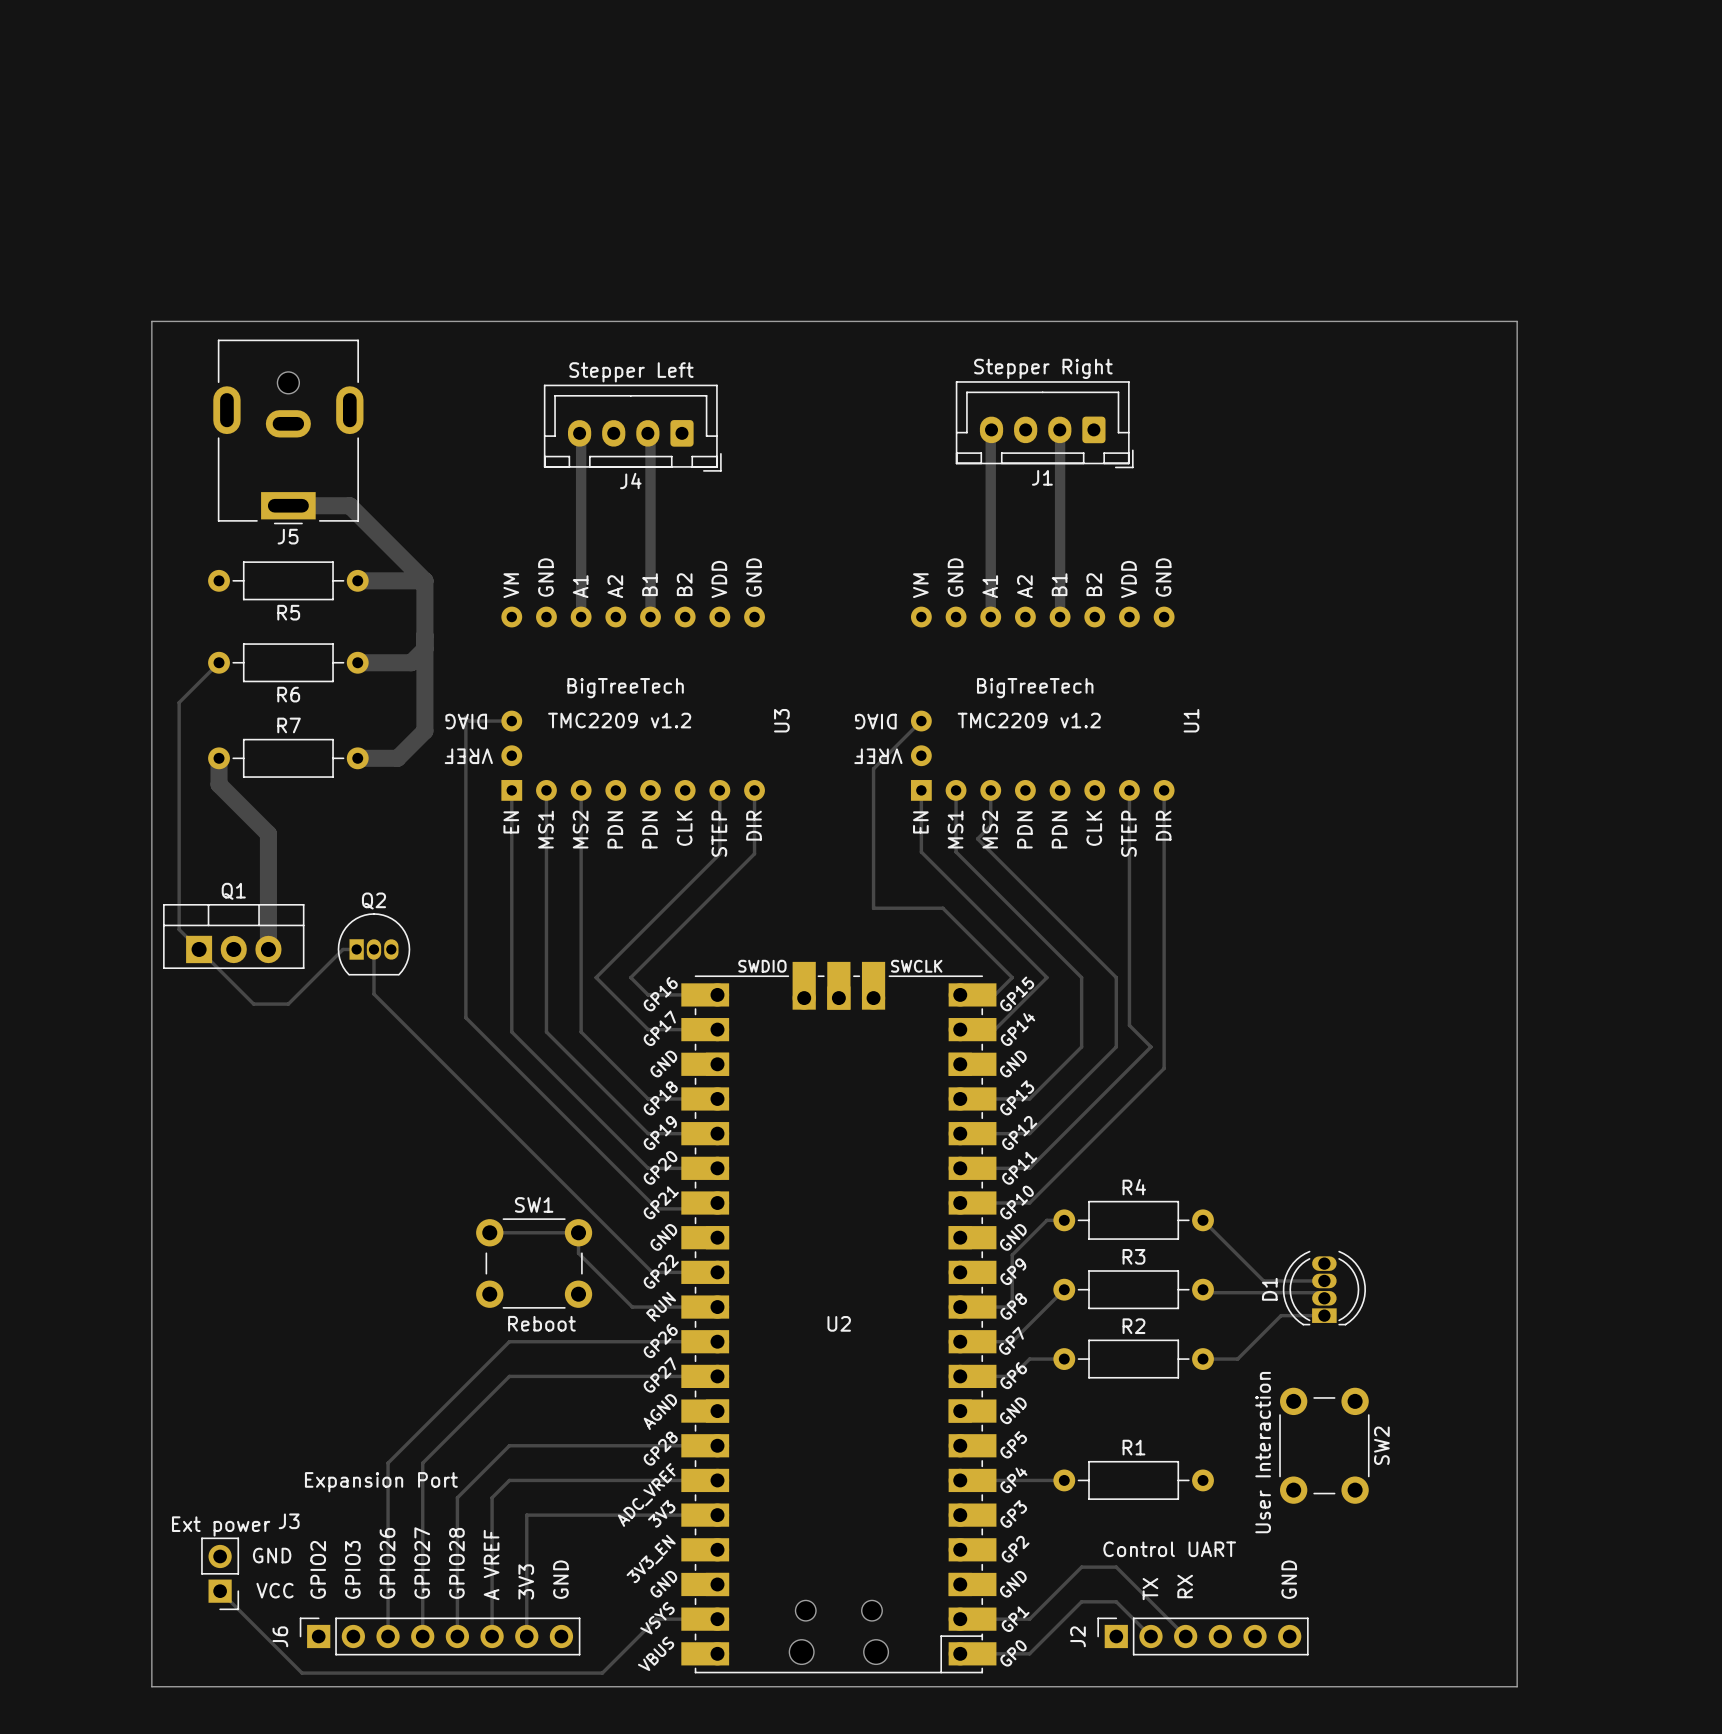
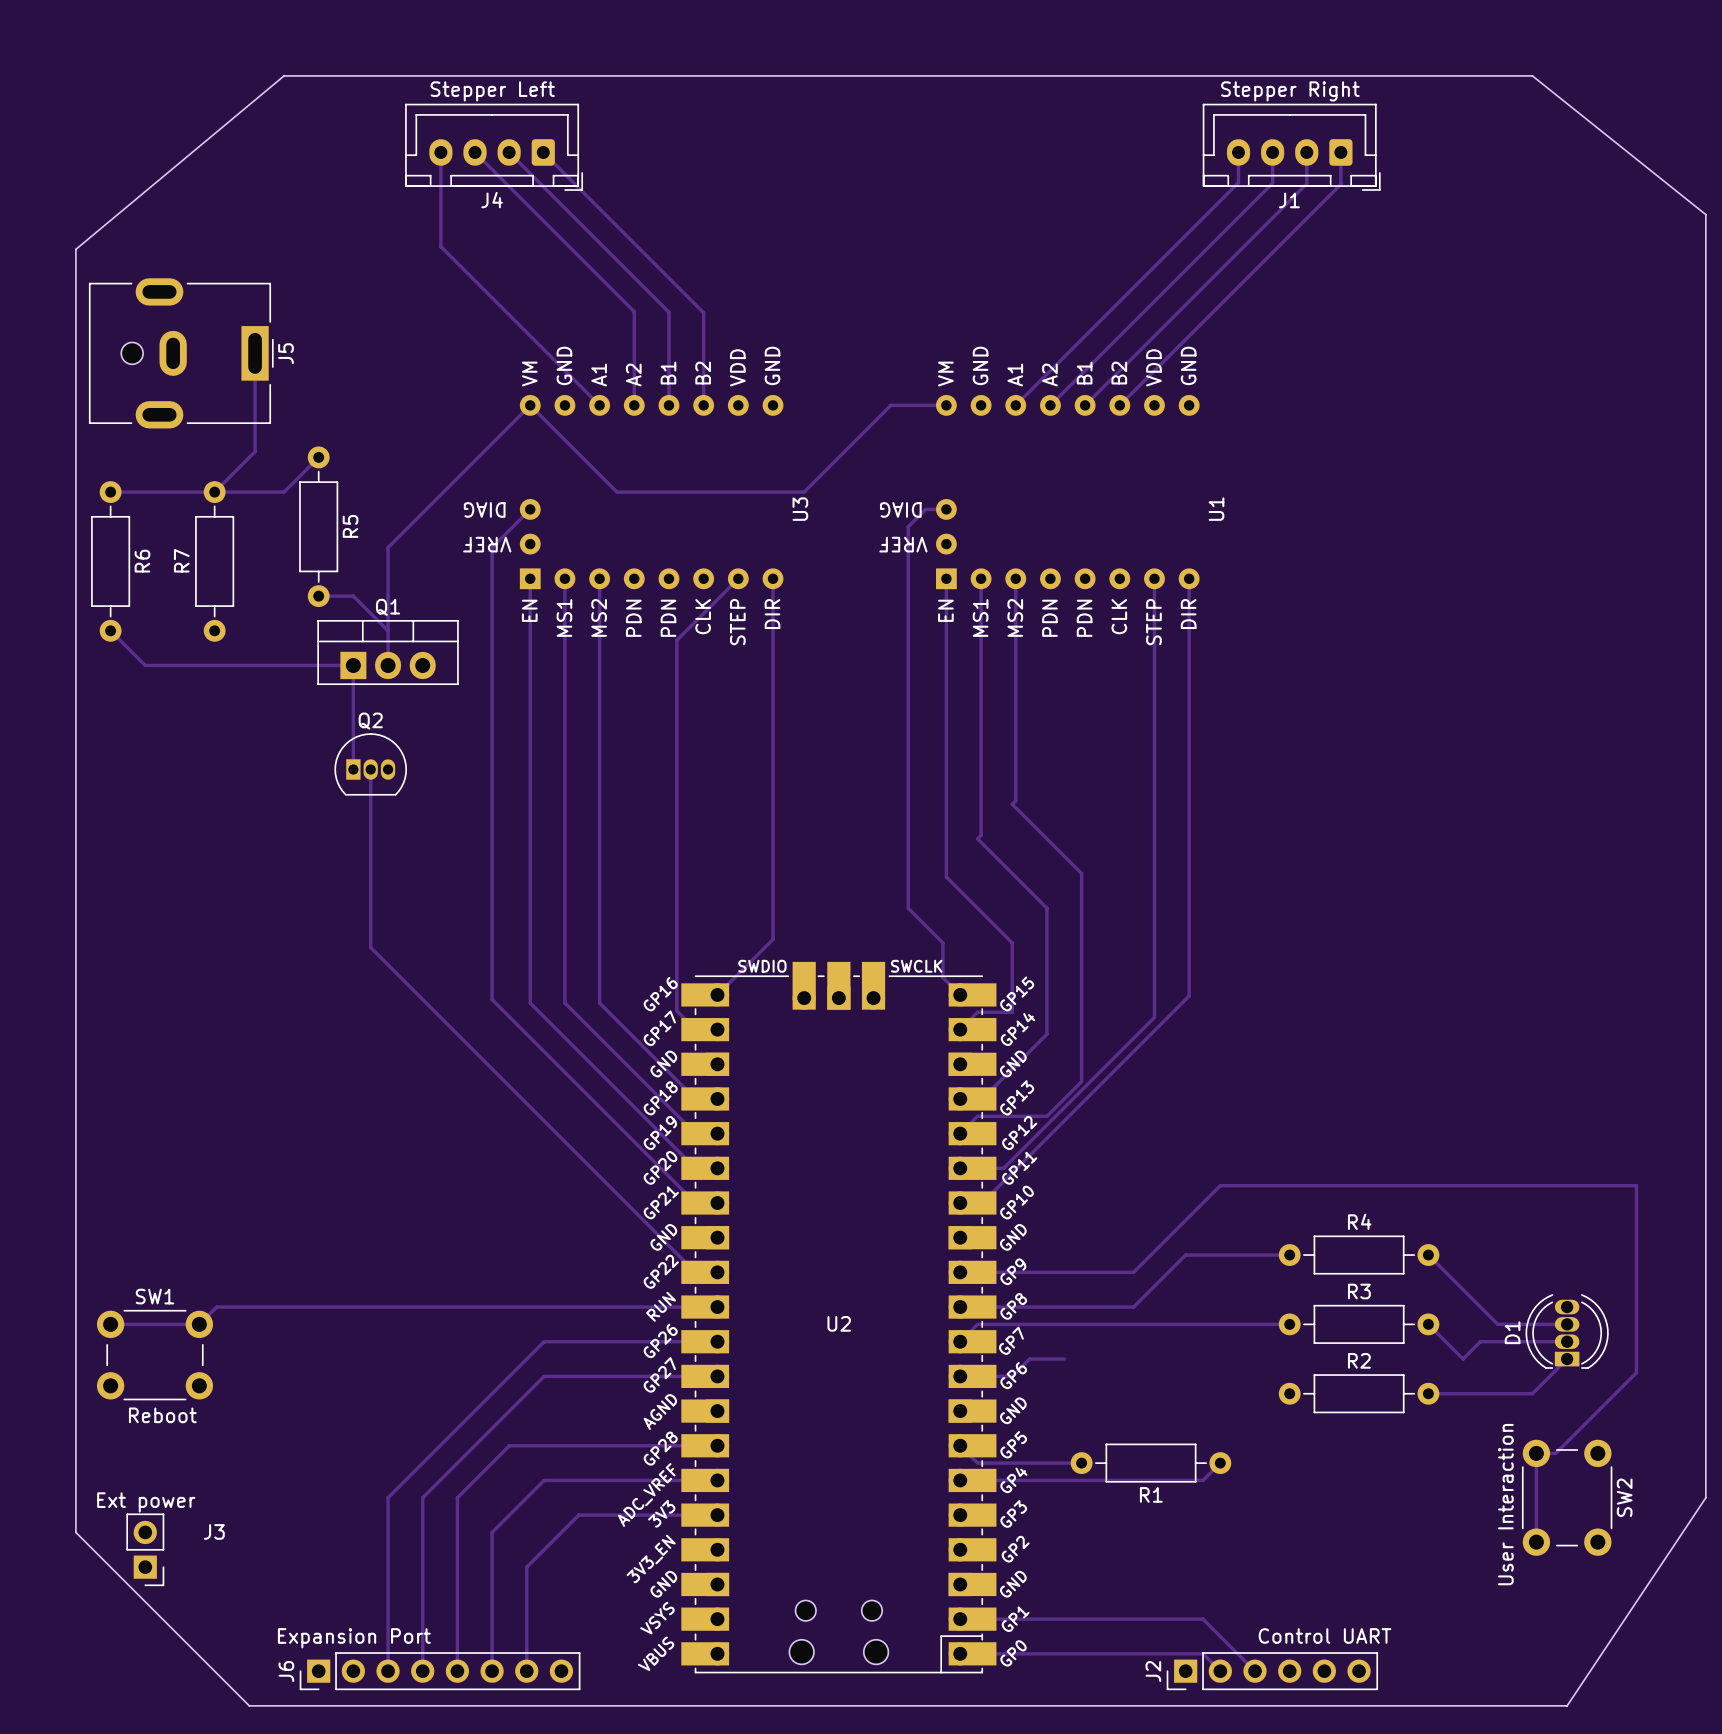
track: none -> (440, 152) (440, 246) (599, 405)
track: none -> (475, 152) (634, 311) (634, 405)
track: none -> (509, 152) (668, 312) (668, 405)
track: none -> (543, 152) (703, 312) (703, 405)
track: none -> (1238, 152) (1238, 182) (1015, 405)
track: none -> (1272, 152) (1272, 183) (1050, 405)
track: none -> (1306, 152) (1306, 183) (1085, 405)
track: none -> (1340, 152) (1340, 184) (1119, 405)
board edge: (151, 321) (1517, 321) (1517, 1686) (151, 1686) (151, 321) -> (284, 75) (75, 249) (75, 1532) (249, 1705) (1567, 1705) (1705, 1497) (1705, 214) (1532, 75) (284, 75)
track: none -> (255, 353) (255, 451) (214, 492)
track: none -> (946, 405) (890, 405) (804, 492) (616, 492) (530, 405) (388, 547) (388, 665)
J1 position: (1044, 424) -> (1291, 147)
J4 position: (632, 428) -> (494, 147)
track: (991, 429) (990, 617) -> none
track: (1059, 429) (1060, 617) -> none
J5 rotation: 0° (288, 431) -> 90° counterclockwise (181, 353)
J5 position: (288, 431) -> (181, 353)
track: (579, 433) (581, 434) (581, 617) -> none
track: (647, 433) (650, 435) (650, 617) -> none
track: none -> (318, 457) (284, 492) (110, 492)
track: (288, 505) (349, 505) (424, 580) -> none
R5 rotation: 0° (288, 580) -> 90° clockwise (318, 526)
track: (357, 580) (424, 580) -> none
track: (424, 580) (424, 731) (397, 758) (357, 758) -> none
track: none -> (318, 596) (353, 596) (388, 630)
R5 name position: R5 (288, 612) -> R5 (350, 526)
track: none -> (110, 630) (145, 665) (353, 665) (353, 769)
track: (424, 649) (411, 662) (357, 662) -> none
track: (219, 662) (179, 702) (179, 929) (253, 1004) (288, 1004) (342, 949) (356, 949) -> none
R6 rotation: 0° (288, 662) -> 90° clockwise (110, 561)
R6 position: (288, 662) -> (110, 561)
U3 text: BigTreeTech (625, 688) -> none
U1 text: BigTreeTech (1035, 688) -> none
R6 name position: R6 (288, 694) -> R6 (142, 561)
U3 position: (633, 703) -> (651, 492)
U1 position: (1042, 703) -> (1067, 492)
U3 text: TMC2209 v1.2 (619, 720) -> none
U1 text: TMC2209 v1.2 (1029, 720) -> none
track: (511, 721) (469, 721) (465, 717) (465, 1017) (657, 1208) (711, 1208) (717, 1203) -> (530, 509) (492, 547) (492, 999) (695, 1203) (717, 1203)
track: (921, 721) (873, 768) (873, 908) (942, 908) (1012, 977) (994, 994) (960, 994) -> (946, 509) (925, 509) (908, 526) (908, 908) (942, 942) (942, 977) (960, 994)
R7 name position: R7 (289, 725) -> R7 (181, 560)
track: (219, 758) (219, 784) (268, 833) (268, 949) -> none
R7 rotation: 0° (288, 758) -> 90° clockwise (214, 561)
R7 position: (288, 758) -> (214, 561)
track: (511, 790) (511, 1031) (648, 1168) (695, 1168) -> (530, 578) (530, 1003) (695, 1168)
track: (546, 790) (546, 1031) (648, 1133) (695, 1133) -> (564, 578) (564, 1003) (695, 1133)
track: (581, 790) (581, 1031) (648, 1098) (695, 1098) -> (599, 578) (599, 1003) (695, 1098)
track: (719, 790) (719, 853) (596, 977) (648, 1029) (695, 1029) -> (738, 578) (676, 640) (676, 1010) (695, 1029)
track: (754, 790) (754, 853) (630, 977) (648, 994) (717, 994) -> (773, 578) (773, 939) (717, 994)
track: (921, 790) (921, 852) (946, 877) -> (946, 578) (946, 877)
track: (956, 790) (956, 852) (1081, 977) -> (1015, 578) (1015, 800) (1012, 804) (1081, 873) (1081, 977)
track: (990, 790) (990, 825) (981, 835) -> (981, 578) (981, 835)
track: (1129, 790) (1129, 1025) (1150, 1046) (1029, 1168) (1003, 1168) -> (1154, 578) (1154, 1017) (1003, 1168)
track: (1164, 790) (1164, 1068) (1029, 1203) (982, 1203) -> (1189, 578) (1189, 996) (982, 1203)
track: (1046, 908) (1116, 977) (1116, 1046) (1081, 1081) -> (1046, 908) (1046, 1034) (982, 1098)
Q1 position: (233, 936) -> (388, 652)
track: (1012, 942) (1046, 977) (994, 1029) (960, 1029) -> (1012, 942) (1012, 1012) (977, 1012) (960, 1029)
Q2 position: (373, 944) -> (370, 764)
track: (373, 949) (373, 994) (652, 1272) (695, 1272) -> (370, 769) (370, 947) (695, 1272)
track: (1081, 1046) (1029, 1098) (982, 1098) -> (1081, 1046) (1081, 1081)
track: (1046, 1116) (1029, 1133) (960, 1133) -> (1046, 1116) (977, 1116) (960, 1133)
track: (1064, 1220) (1046, 1220) (1012, 1255) (1012, 1307) -> (1289, 1255) (1185, 1255) (1133, 1307) (1012, 1307)
R4 position: (1133, 1220) -> (1359, 1255)
track: (1203, 1220) (1263, 1280) (1324, 1280) -> none
track: (489, 1232) (578, 1232) (578, 1253) (632, 1307) -> (110, 1324) (199, 1324) (216, 1307) (632, 1307)
track: none -> (1428, 1255) (1497, 1324) (1567, 1324)
SW1 position: (534, 1263) -> (154, 1355)
track: none -> (960, 1272) (1133, 1272) (1220, 1185) (1636, 1185) (1636, 1372) (1555, 1453) (1536, 1453) (1536, 1542)
D1 position: (1324, 1288) -> (1567, 1331)
track: (1064, 1289) (1012, 1341) (960, 1341) -> (1289, 1324) (977, 1324) (960, 1341)
R3 position: (1133, 1289) -> (1359, 1324)
track: (1203, 1289) (1206, 1292) (1324, 1292) -> none
track: (1324, 1315) (1281, 1315) (1237, 1359) (1203, 1359) -> none
track: none -> (1428, 1324) (1463, 1359) (1480, 1341) (1567, 1341)
track: (544, 1341) (509, 1341) (388, 1463) (388, 1497) -> none
R2 position: (1133, 1359) -> (1359, 1393)
track: none -> (1567, 1359) (1532, 1393) (1428, 1393)
track: (509, 1376) (544, 1376) -> (509, 1376) (544, 1341)
track: none -> (544, 1376) (422, 1497)
track: none -> (960, 1445) (977, 1463) (1081, 1463)
SW2 position: (1324, 1445) -> (1567, 1497)
R1 name position: R1 (1133, 1447) -> R1 (1151, 1494)
track: (422, 1463) (422, 1497) -> (422, 1463) (388, 1497)
track: none -> (1220, 1463) (1203, 1480) (1064, 1480)
track: (544, 1480) (509, 1480) (492, 1497) (492, 1532) -> (544, 1480) (492, 1532)
R1 position: (1133, 1480) -> (1150, 1463)
J6 value position: Expansion Port (381, 1482) -> Expansion Port (354, 1638)
track: (578, 1515) (526, 1515) (526, 1567) -> (578, 1515) (526, 1567)
J3 name position: J3 (289, 1521) -> J3 (214, 1531)
J2 value position: Control UART (1169, 1549) -> Control UART (1325, 1635)
J3 text: GND (272, 1555) -> none
J3 position: (220, 1573) -> (145, 1549)
J3 text: VCC (274, 1590) -> none
track: (220, 1591) (302, 1673) (602, 1673) (656, 1619) (717, 1619) -> none
J6 footprint: [299, 1617, 581, 1656] -> [299, 1652, 581, 1691]
J2 footprint: [1097, 1617, 1309, 1656] -> [1166, 1652, 1379, 1691]
track: (1029, 1619) (1081, 1567) (1116, 1567) (1185, 1636) -> (1029, 1619) (1203, 1619) (1255, 1671)
track: none -> (388, 1636) (388, 1671)
track: none -> (422, 1636) (422, 1671)
track: none -> (457, 1636) (457, 1671)
track: none -> (492, 1636) (492, 1671)
track: none -> (526, 1636) (526, 1671)
track: (1150, 1636) (1116, 1601) (1081, 1601) (1029, 1653) -> (1220, 1671) (1203, 1653) (1029, 1653)

